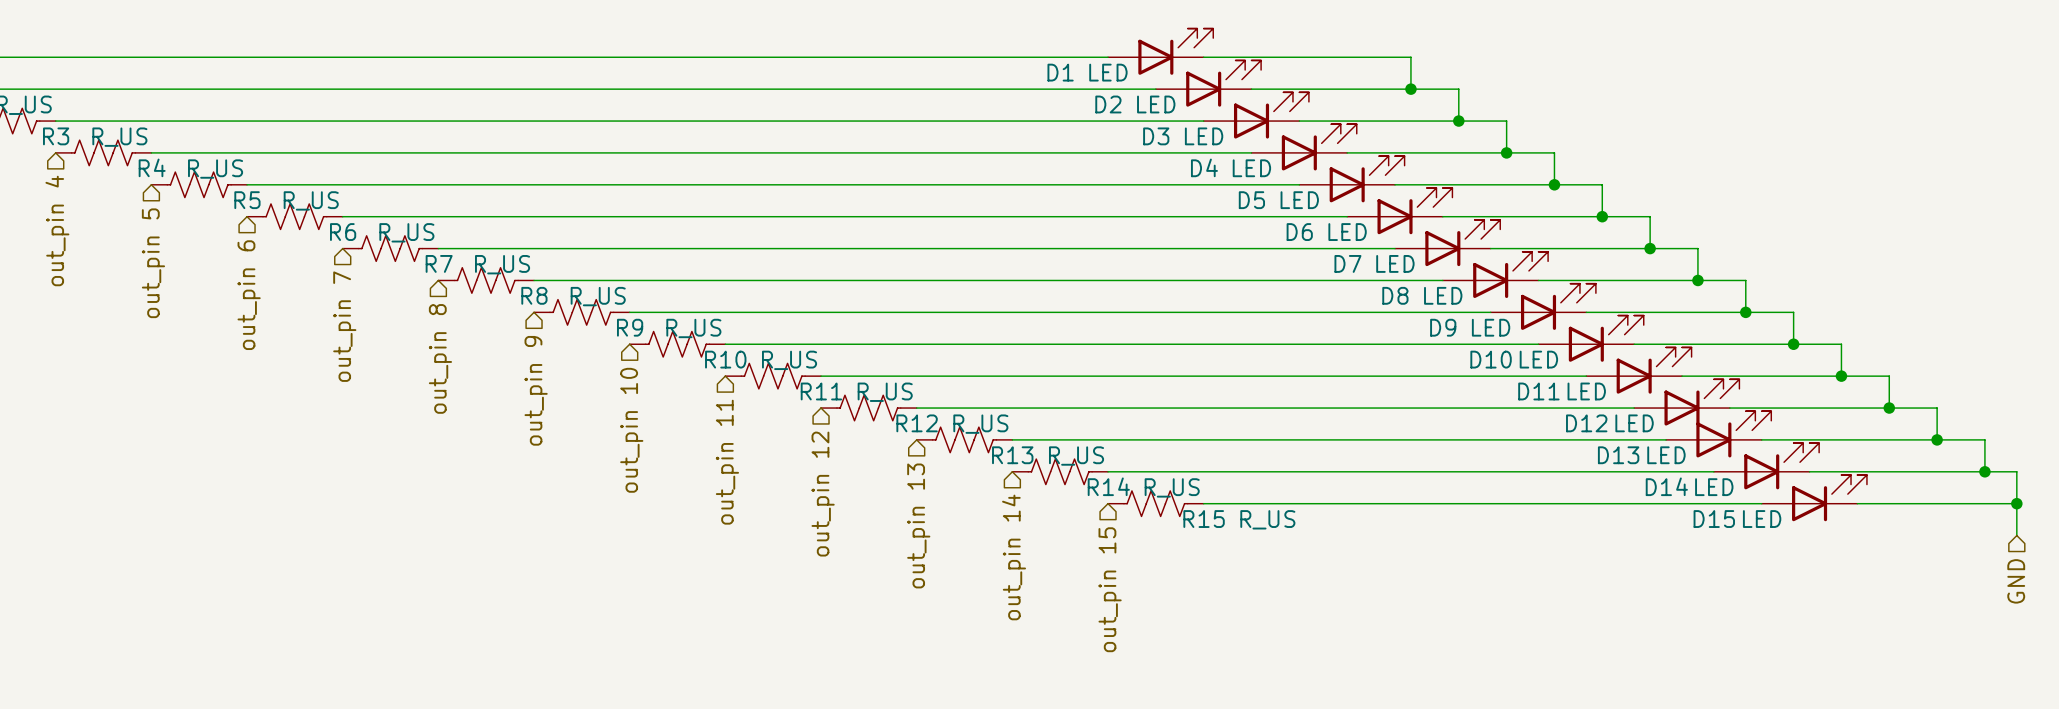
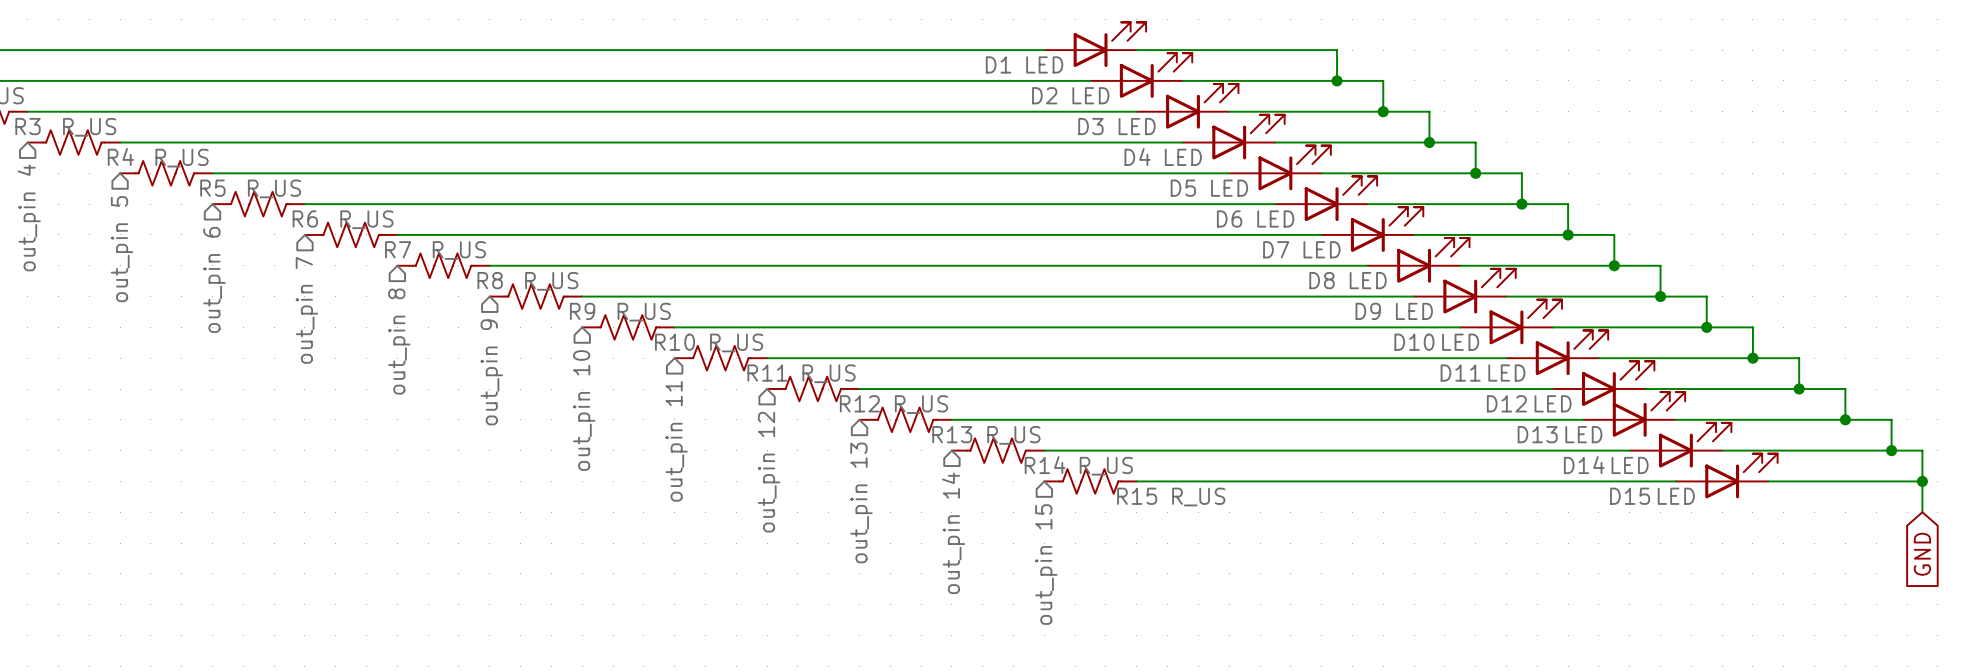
global label: none -> GND (1922, 554)
hierarchical label: GND (2016, 581) -> none

